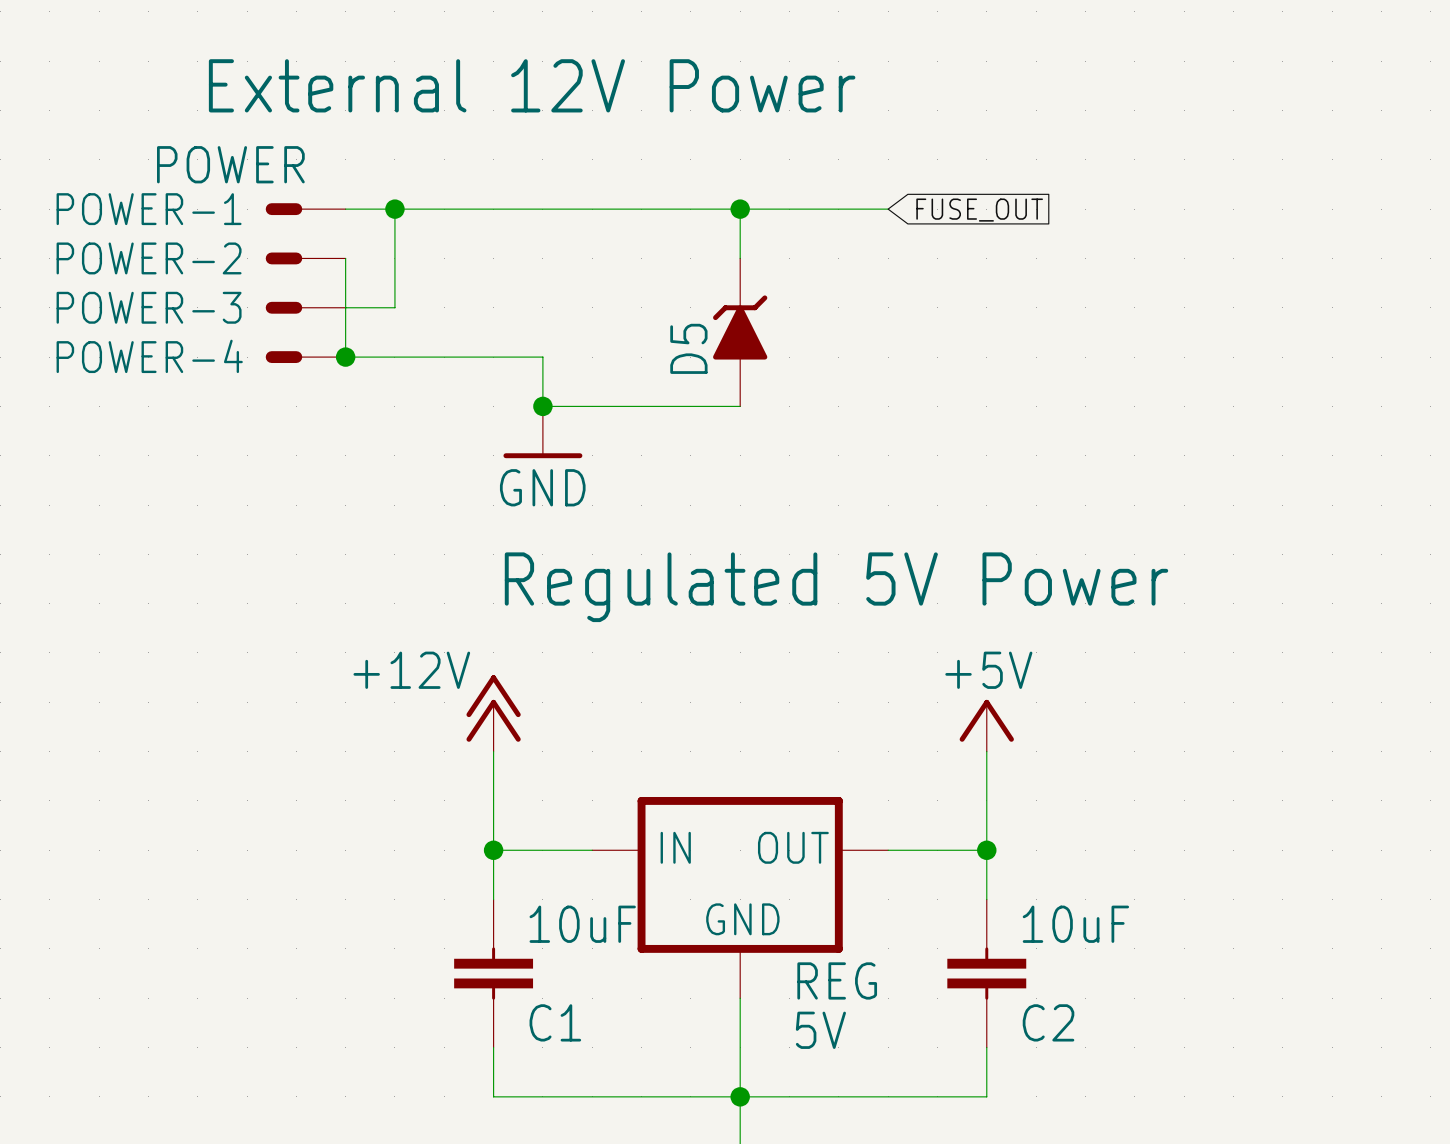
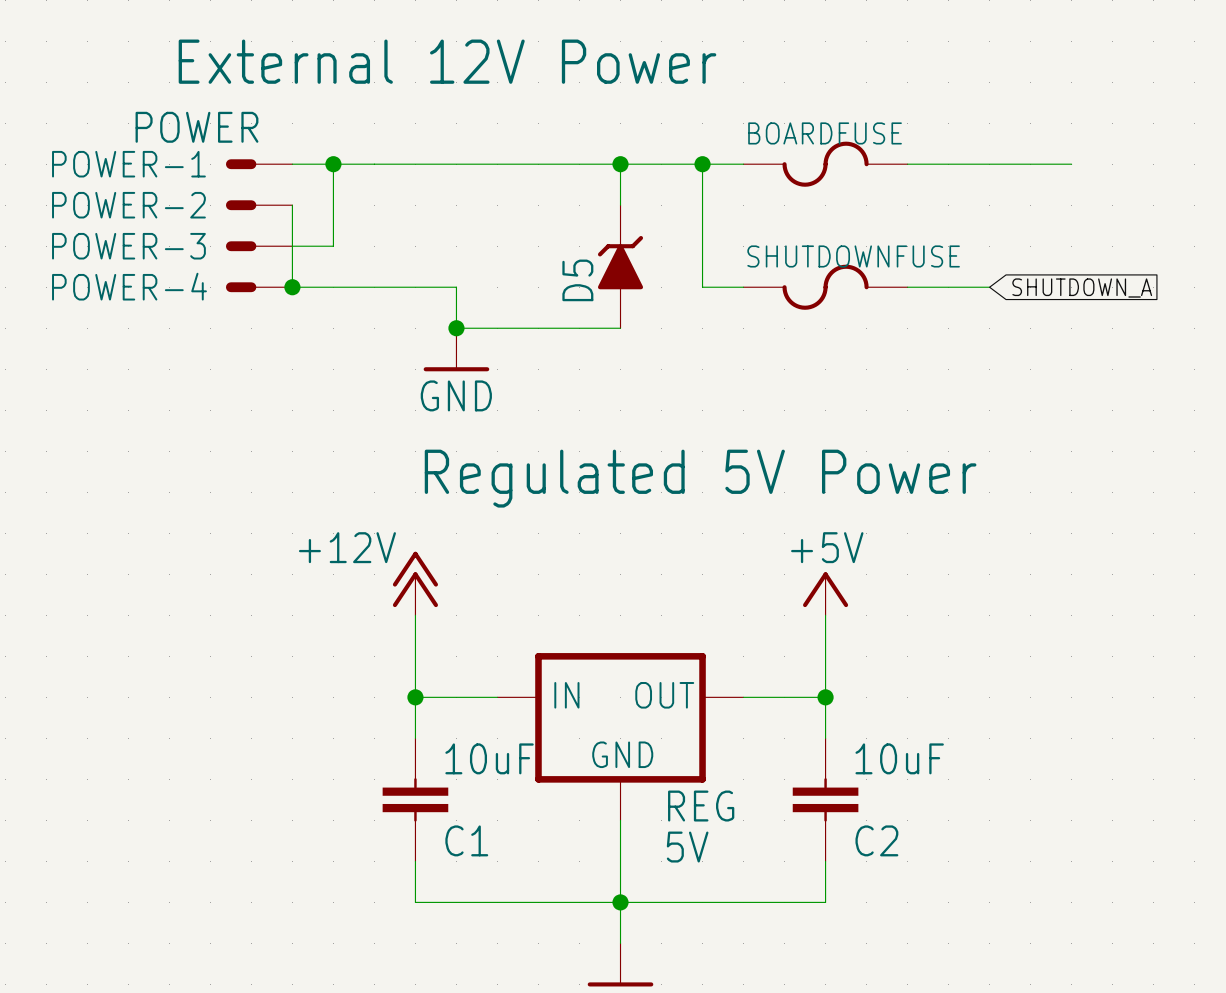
wire: none -> (702, 164) (702, 287) (743, 287)
junction: none -> (702, 164)
BOARDFUSE: none -> (825, 164)
wire: none -> (907, 164) (1071, 164)
global label: FUSE_OUT (979, 210) -> none
SHUTDOWNFUSE: none -> (825, 287)
wire: none -> (907, 287) (989, 287)
global label: none -> SHUTDOWN_A (1082, 288)

